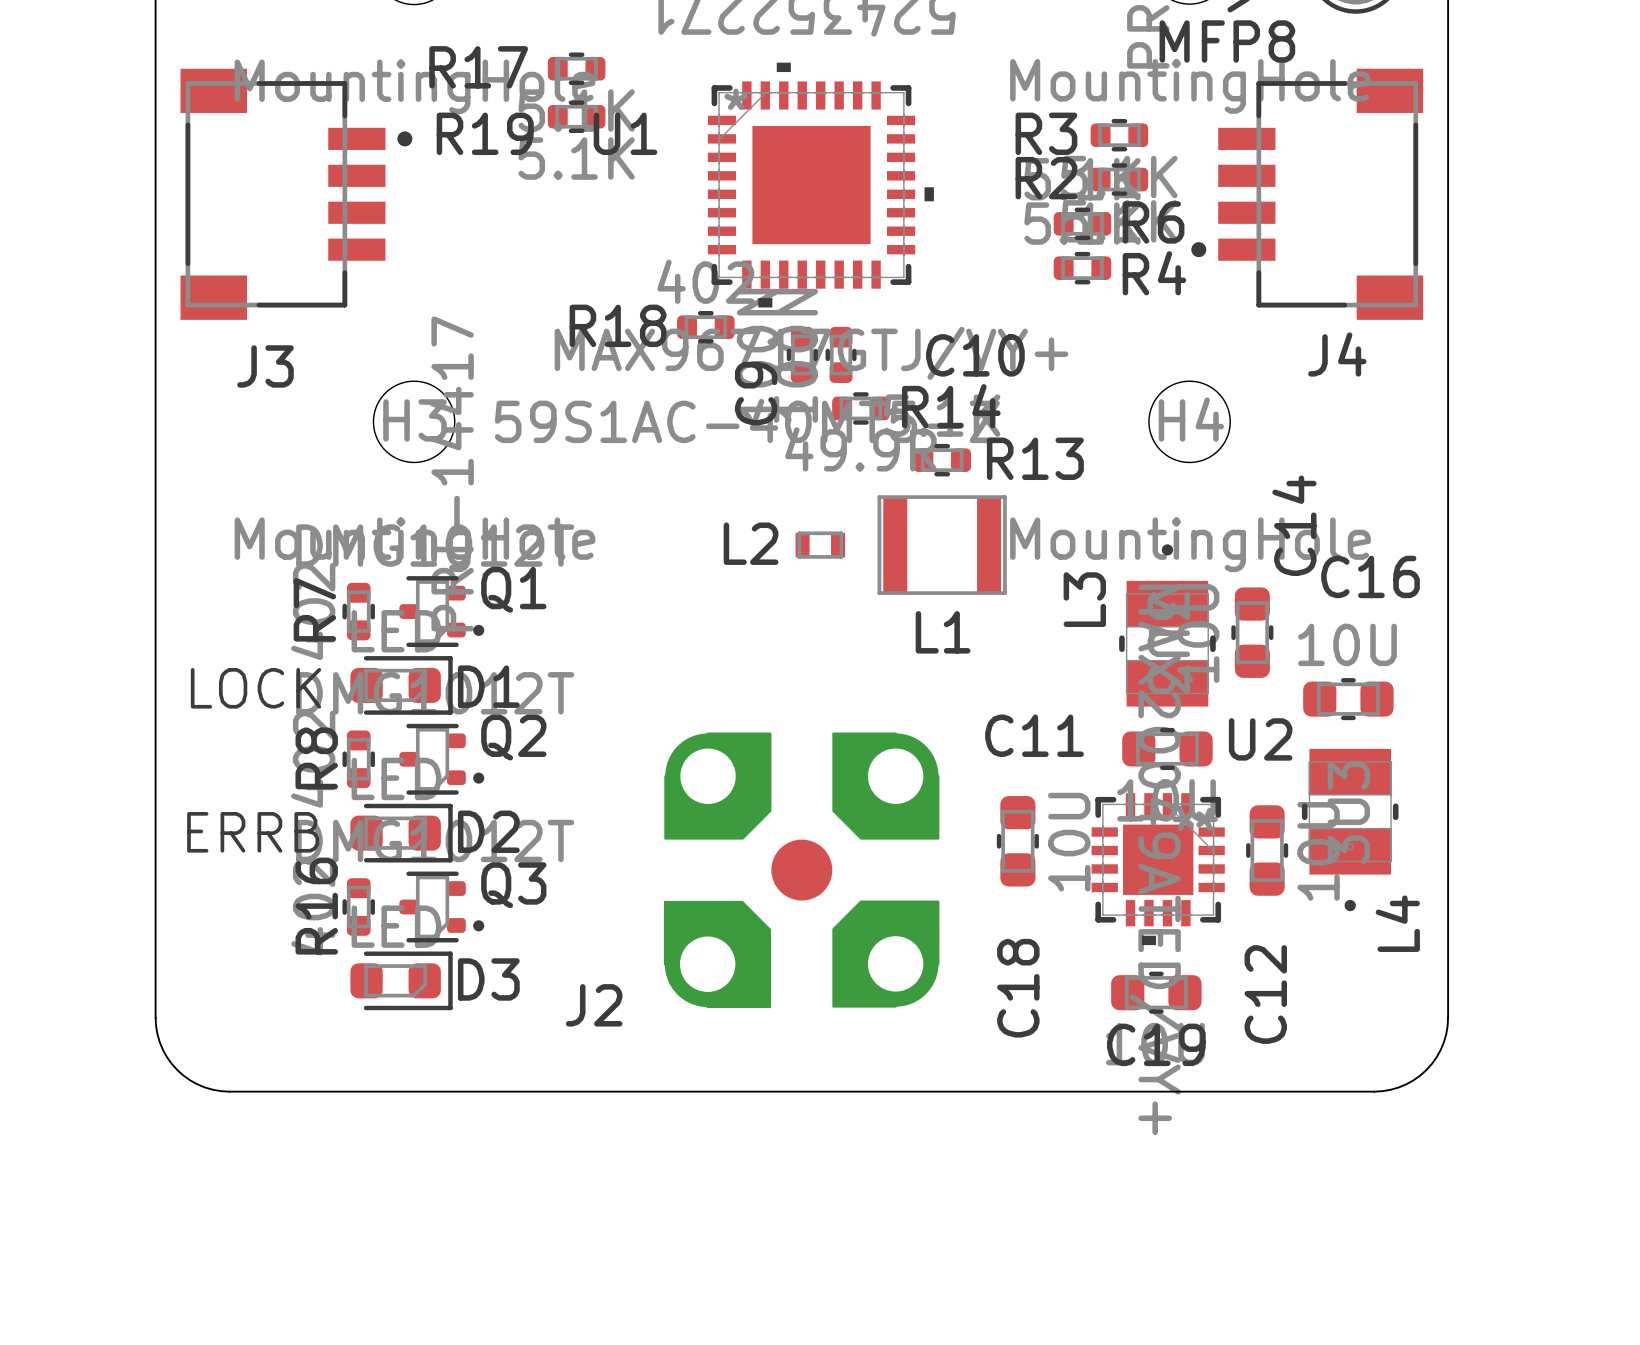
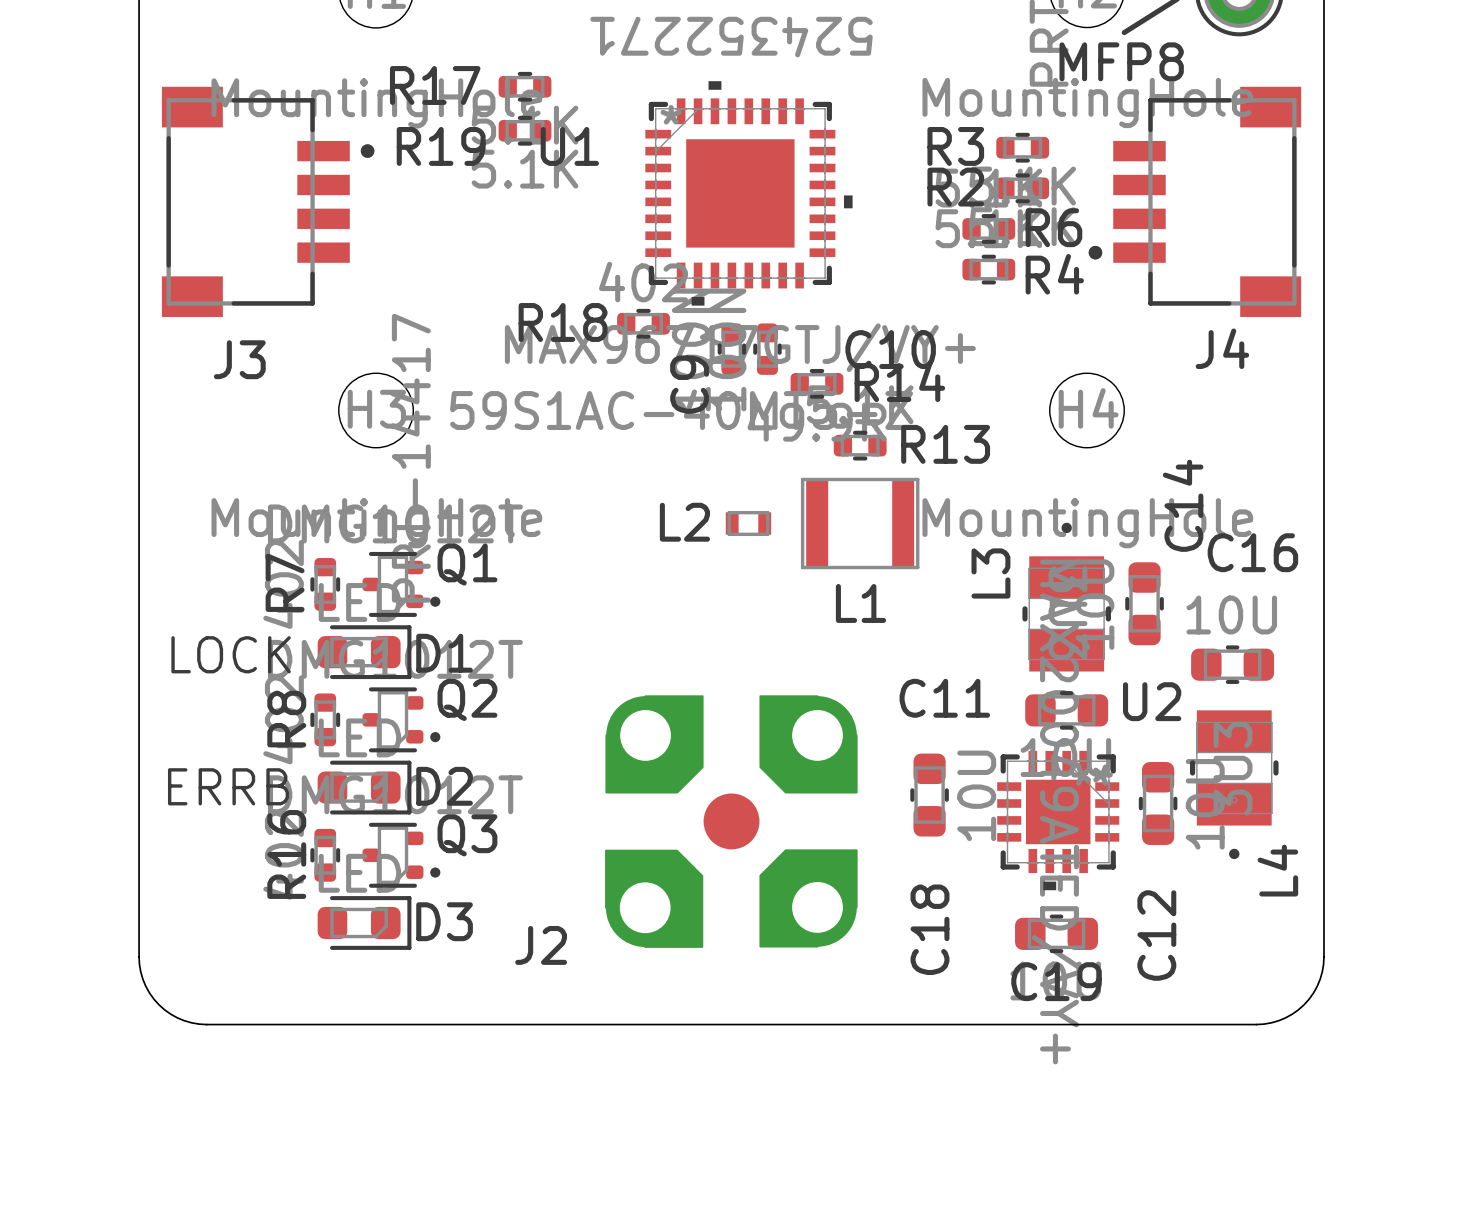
R14 position: (860, 408) -> (817, 383)

